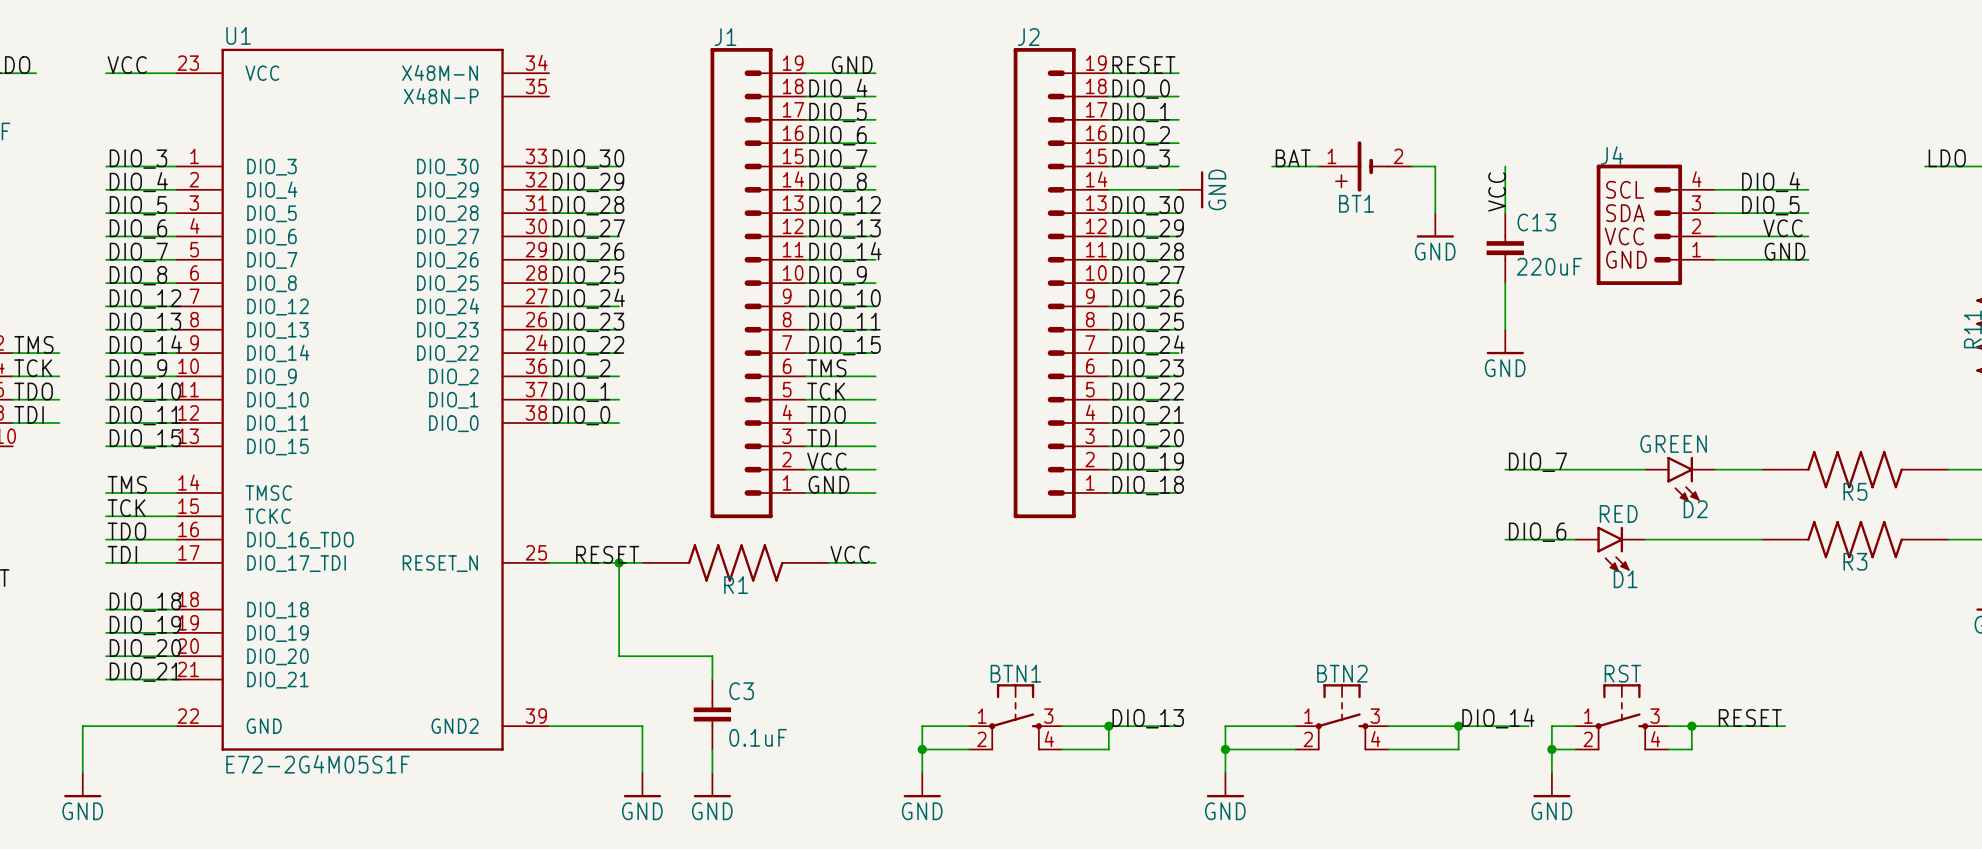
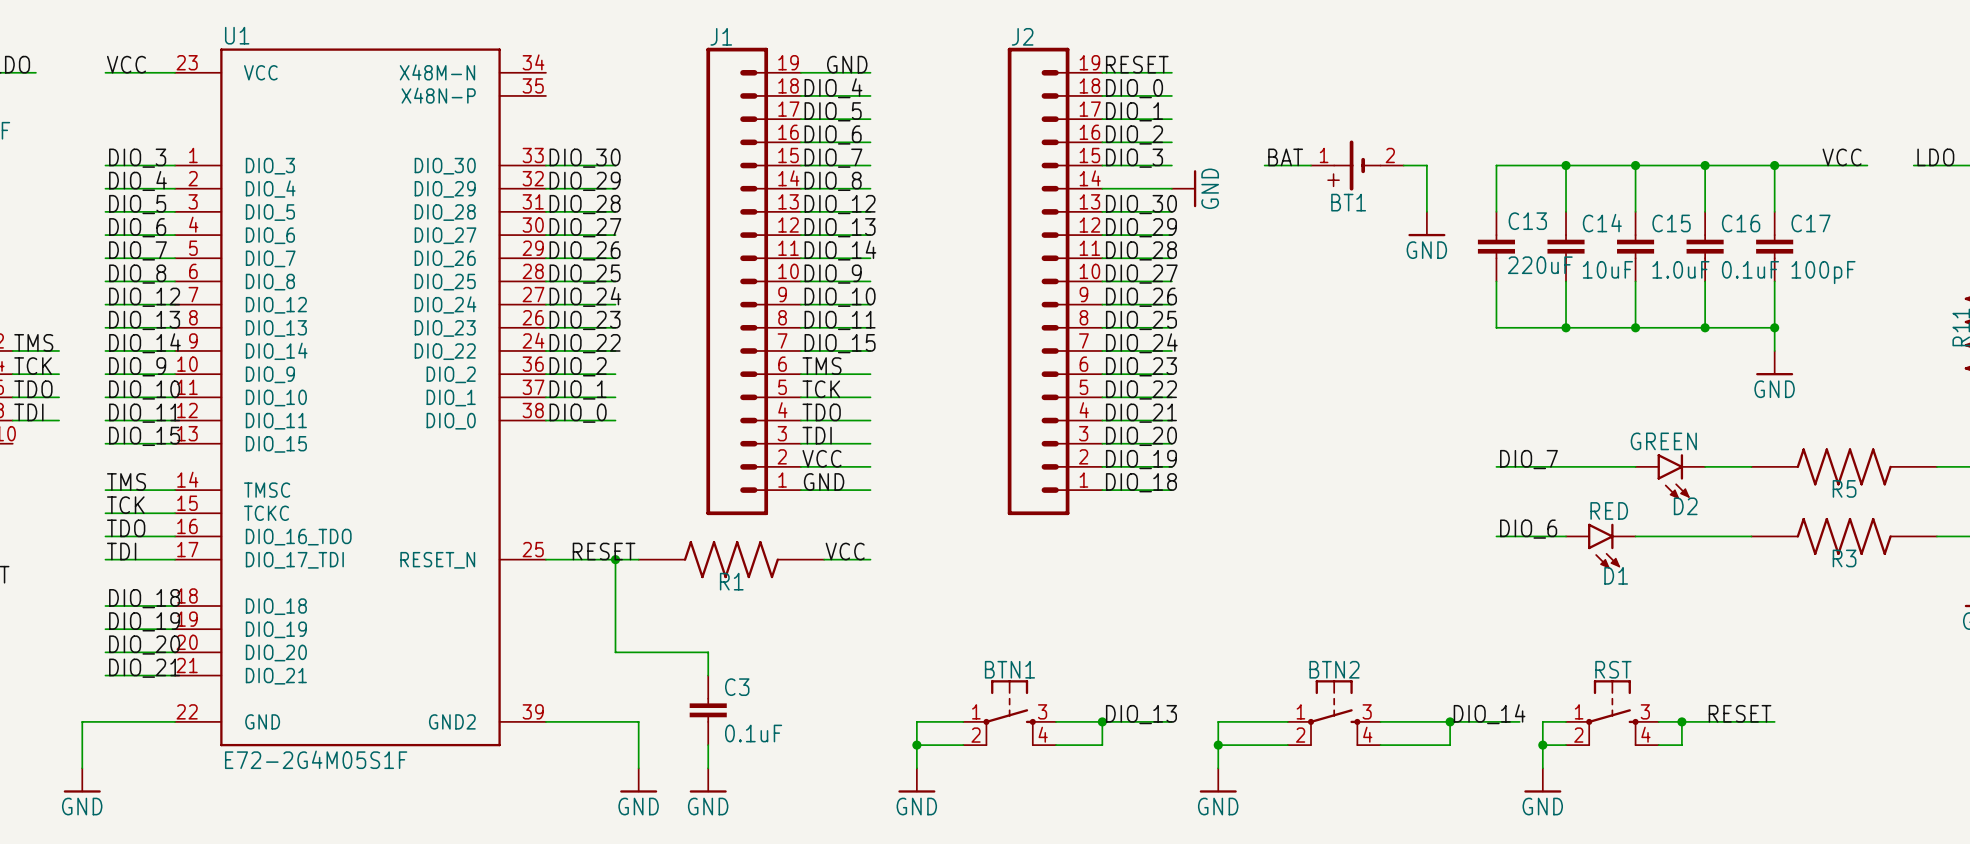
wire: none -> (1496, 165) (1867, 165)
wire: none -> (1566, 165) (1566, 211)
junction: none -> (1566, 165)
wire: none -> (1635, 165) (1635, 211)
junction: none -> (1635, 165)
junction: none -> (1705, 165)
wire: none -> (1774, 165) (1774, 211)
junction: none -> (1774, 165)
label: DIO_4 (1771, 182) -> none
wire: (1715, 189) (1808, 189) -> none
label: VCC (1497, 191) -> none
label: DIO_5 (1770, 205) -> none
wire: (1715, 213) (1808, 213) -> (1705, 211) (1705, 165)
J4: (1655, 224) -> none
label position: VCC (1782, 228) -> VCC (1842, 157)
wire: (1715, 236) (1808, 236) -> none
C14: none -> 10uF (1566, 246)
C15: none -> 1.0uF (1635, 246)
C16: none -> 0.1uF (1705, 246)
C17: none -> 100pF (1774, 246)
label: GND (1785, 251) -> none
wire: (1715, 259) (1808, 259) -> none
wire: none -> (1566, 281) (1566, 327)
wire: none -> (1635, 281) (1635, 327)
wire: none -> (1705, 281) (1705, 327)
wire: none -> (1774, 281) (1774, 350)
wire: none -> (1496, 327) (1774, 327)
junction: none -> (1566, 327)
junction: none -> (1635, 327)
junction: none -> (1705, 327)
junction: none -> (1774, 327)
power symbol: GND (1505, 341) -> none
power symbol: none -> GND (1774, 363)

